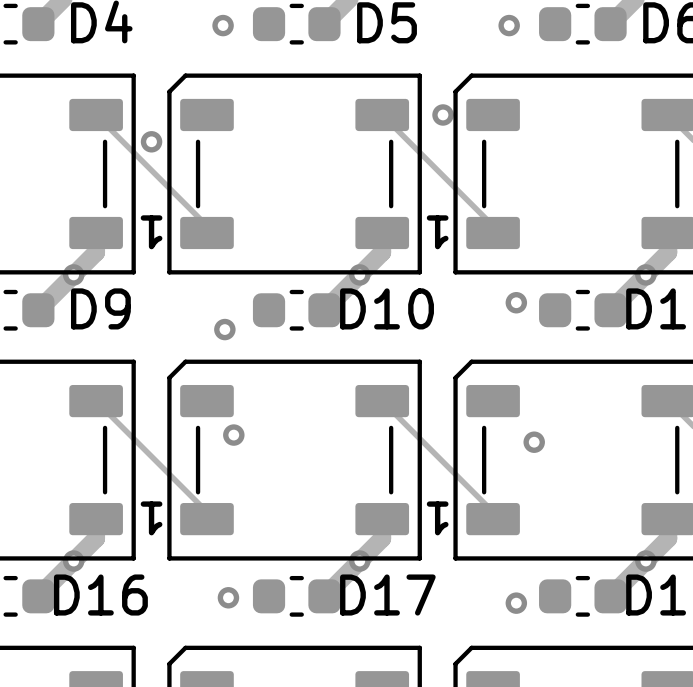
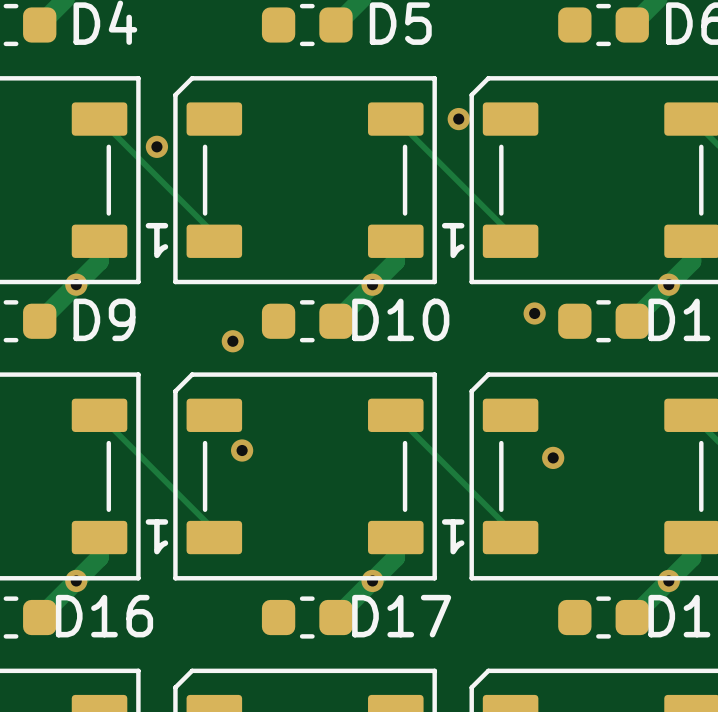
via: (223, 25) -> none
via: (509, 25) -> none
via: (228, 597) -> none
via: (516, 603) -> none

